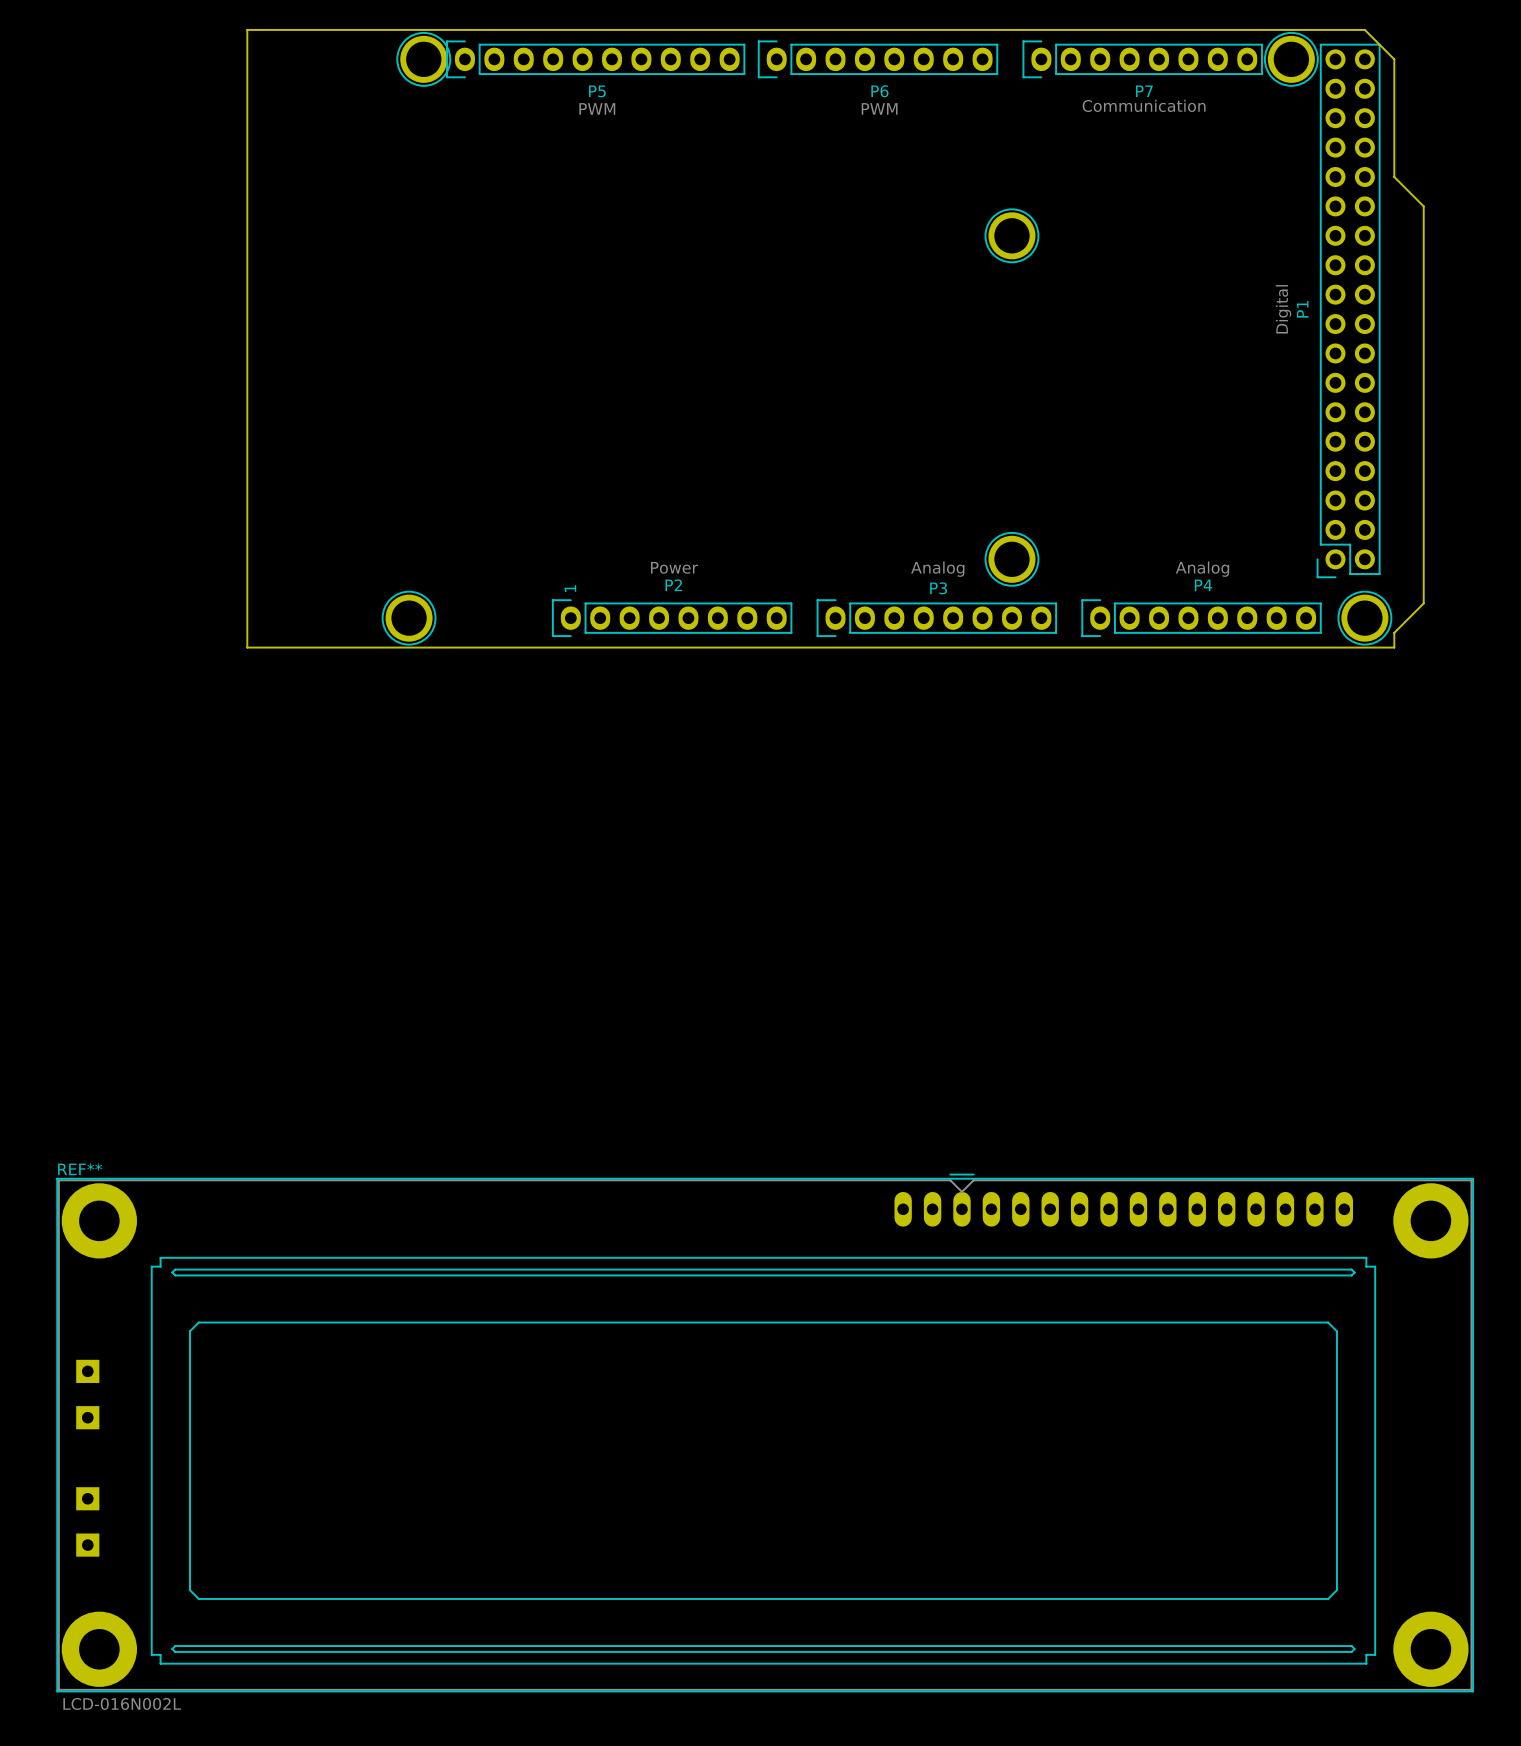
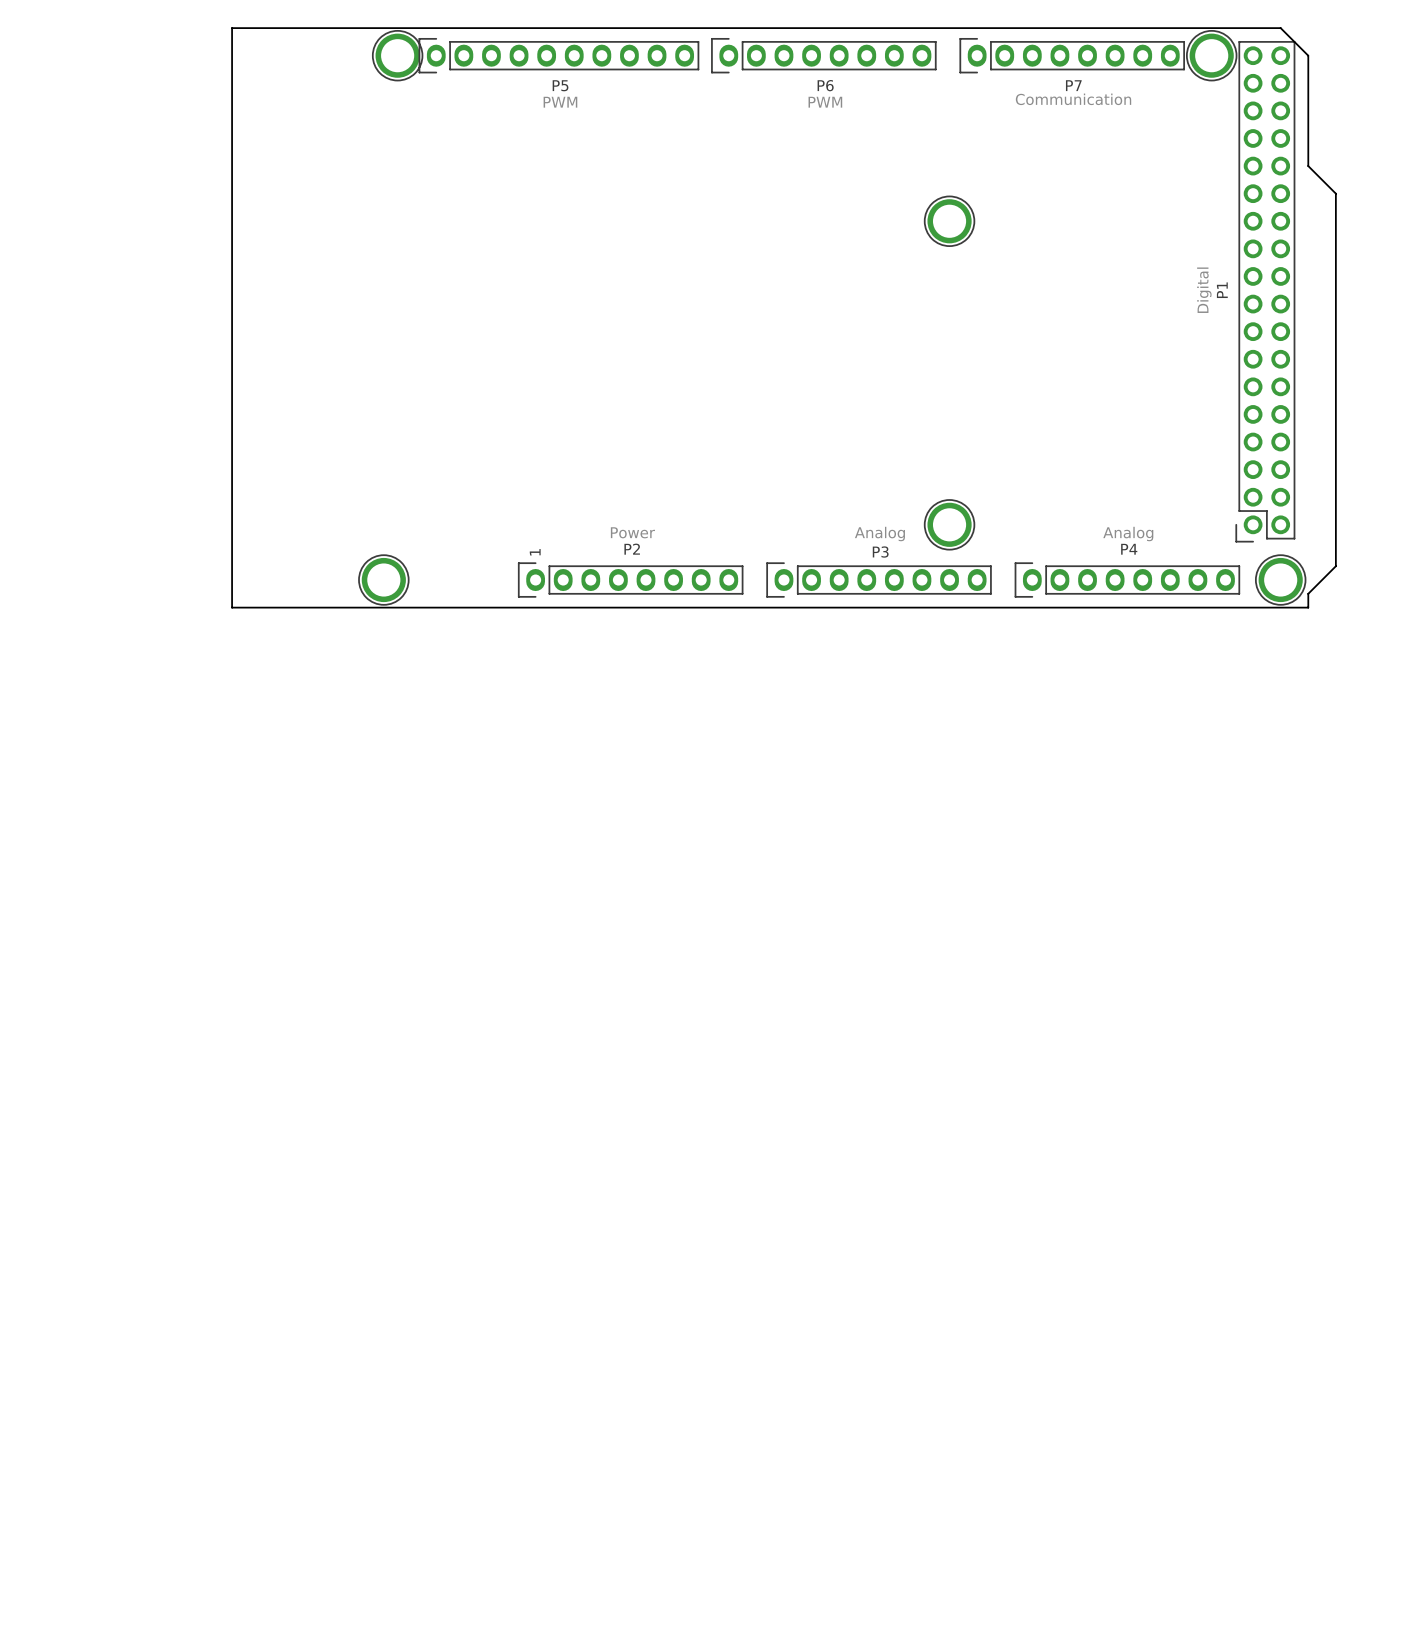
REF**: LCD-016N002L (765, 1432) -> none

